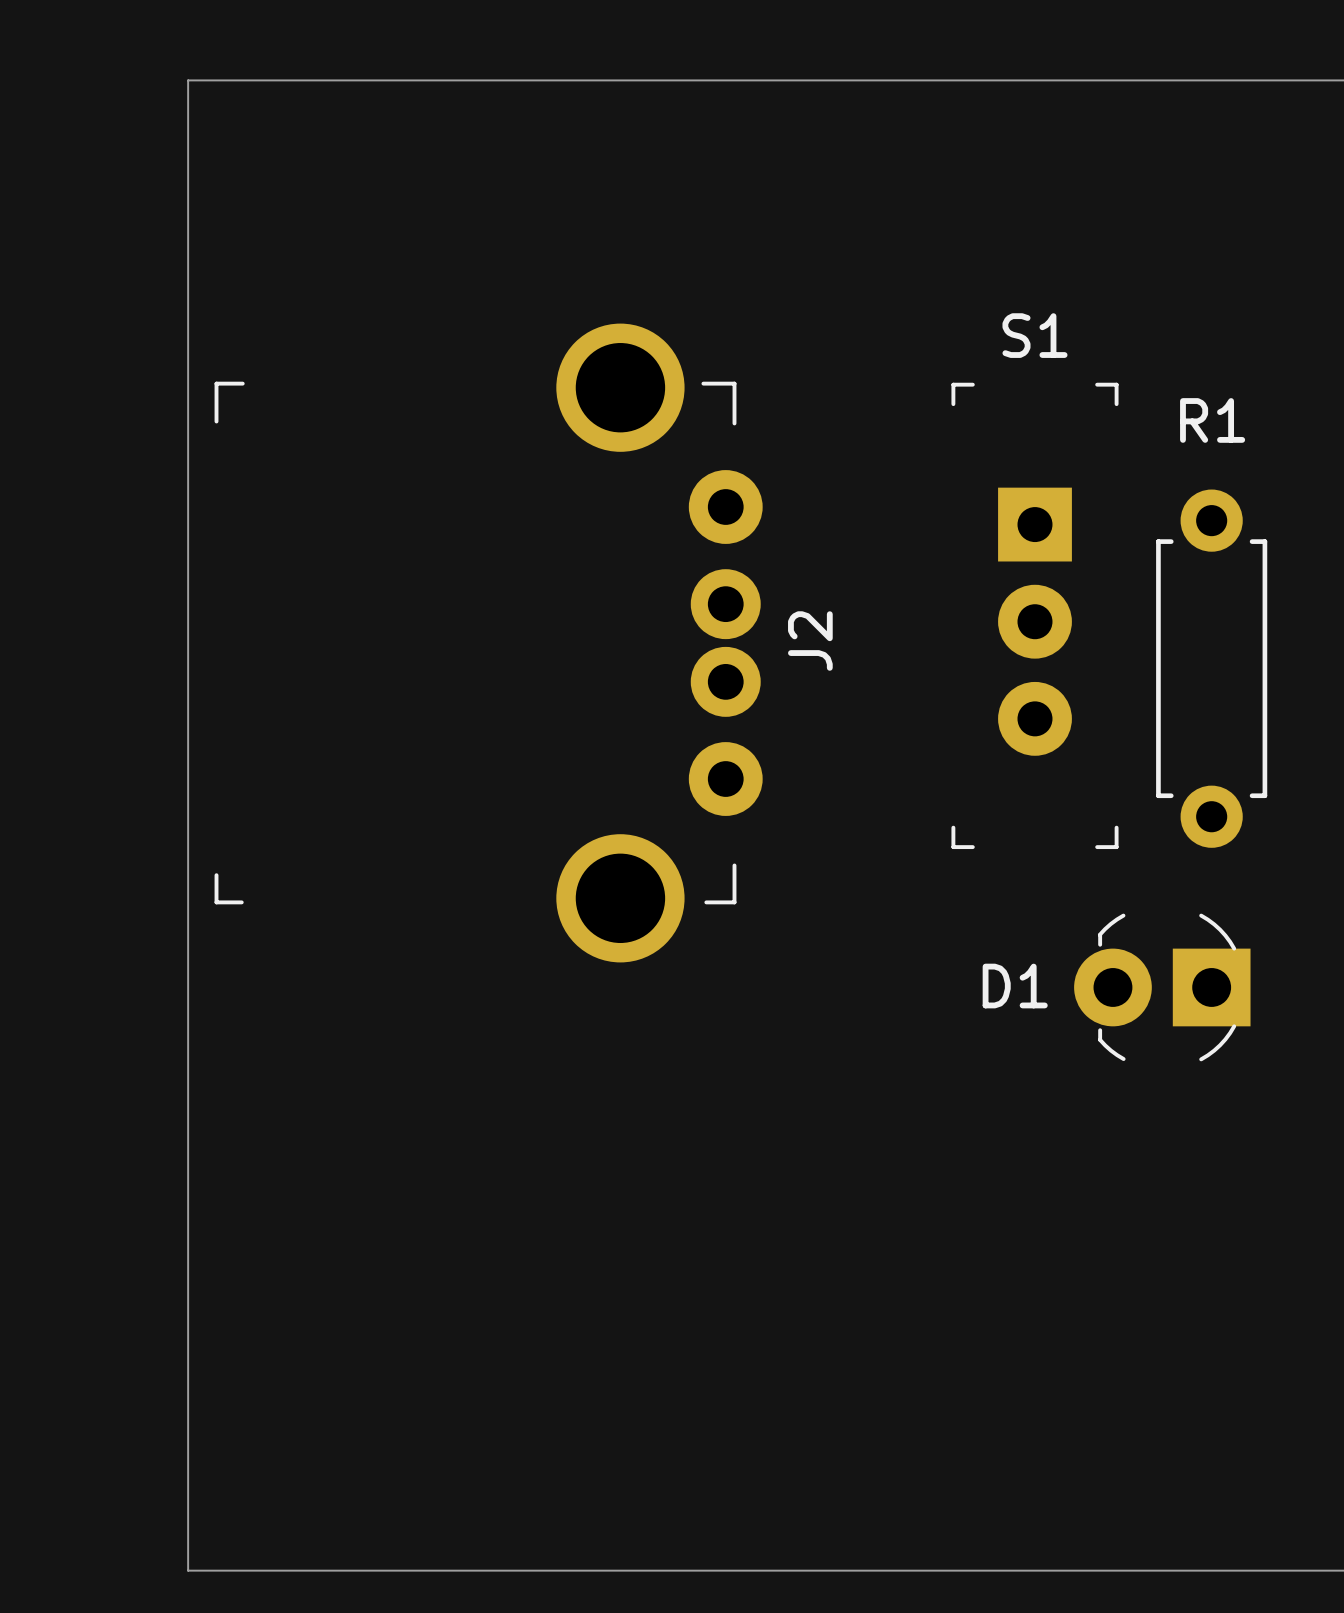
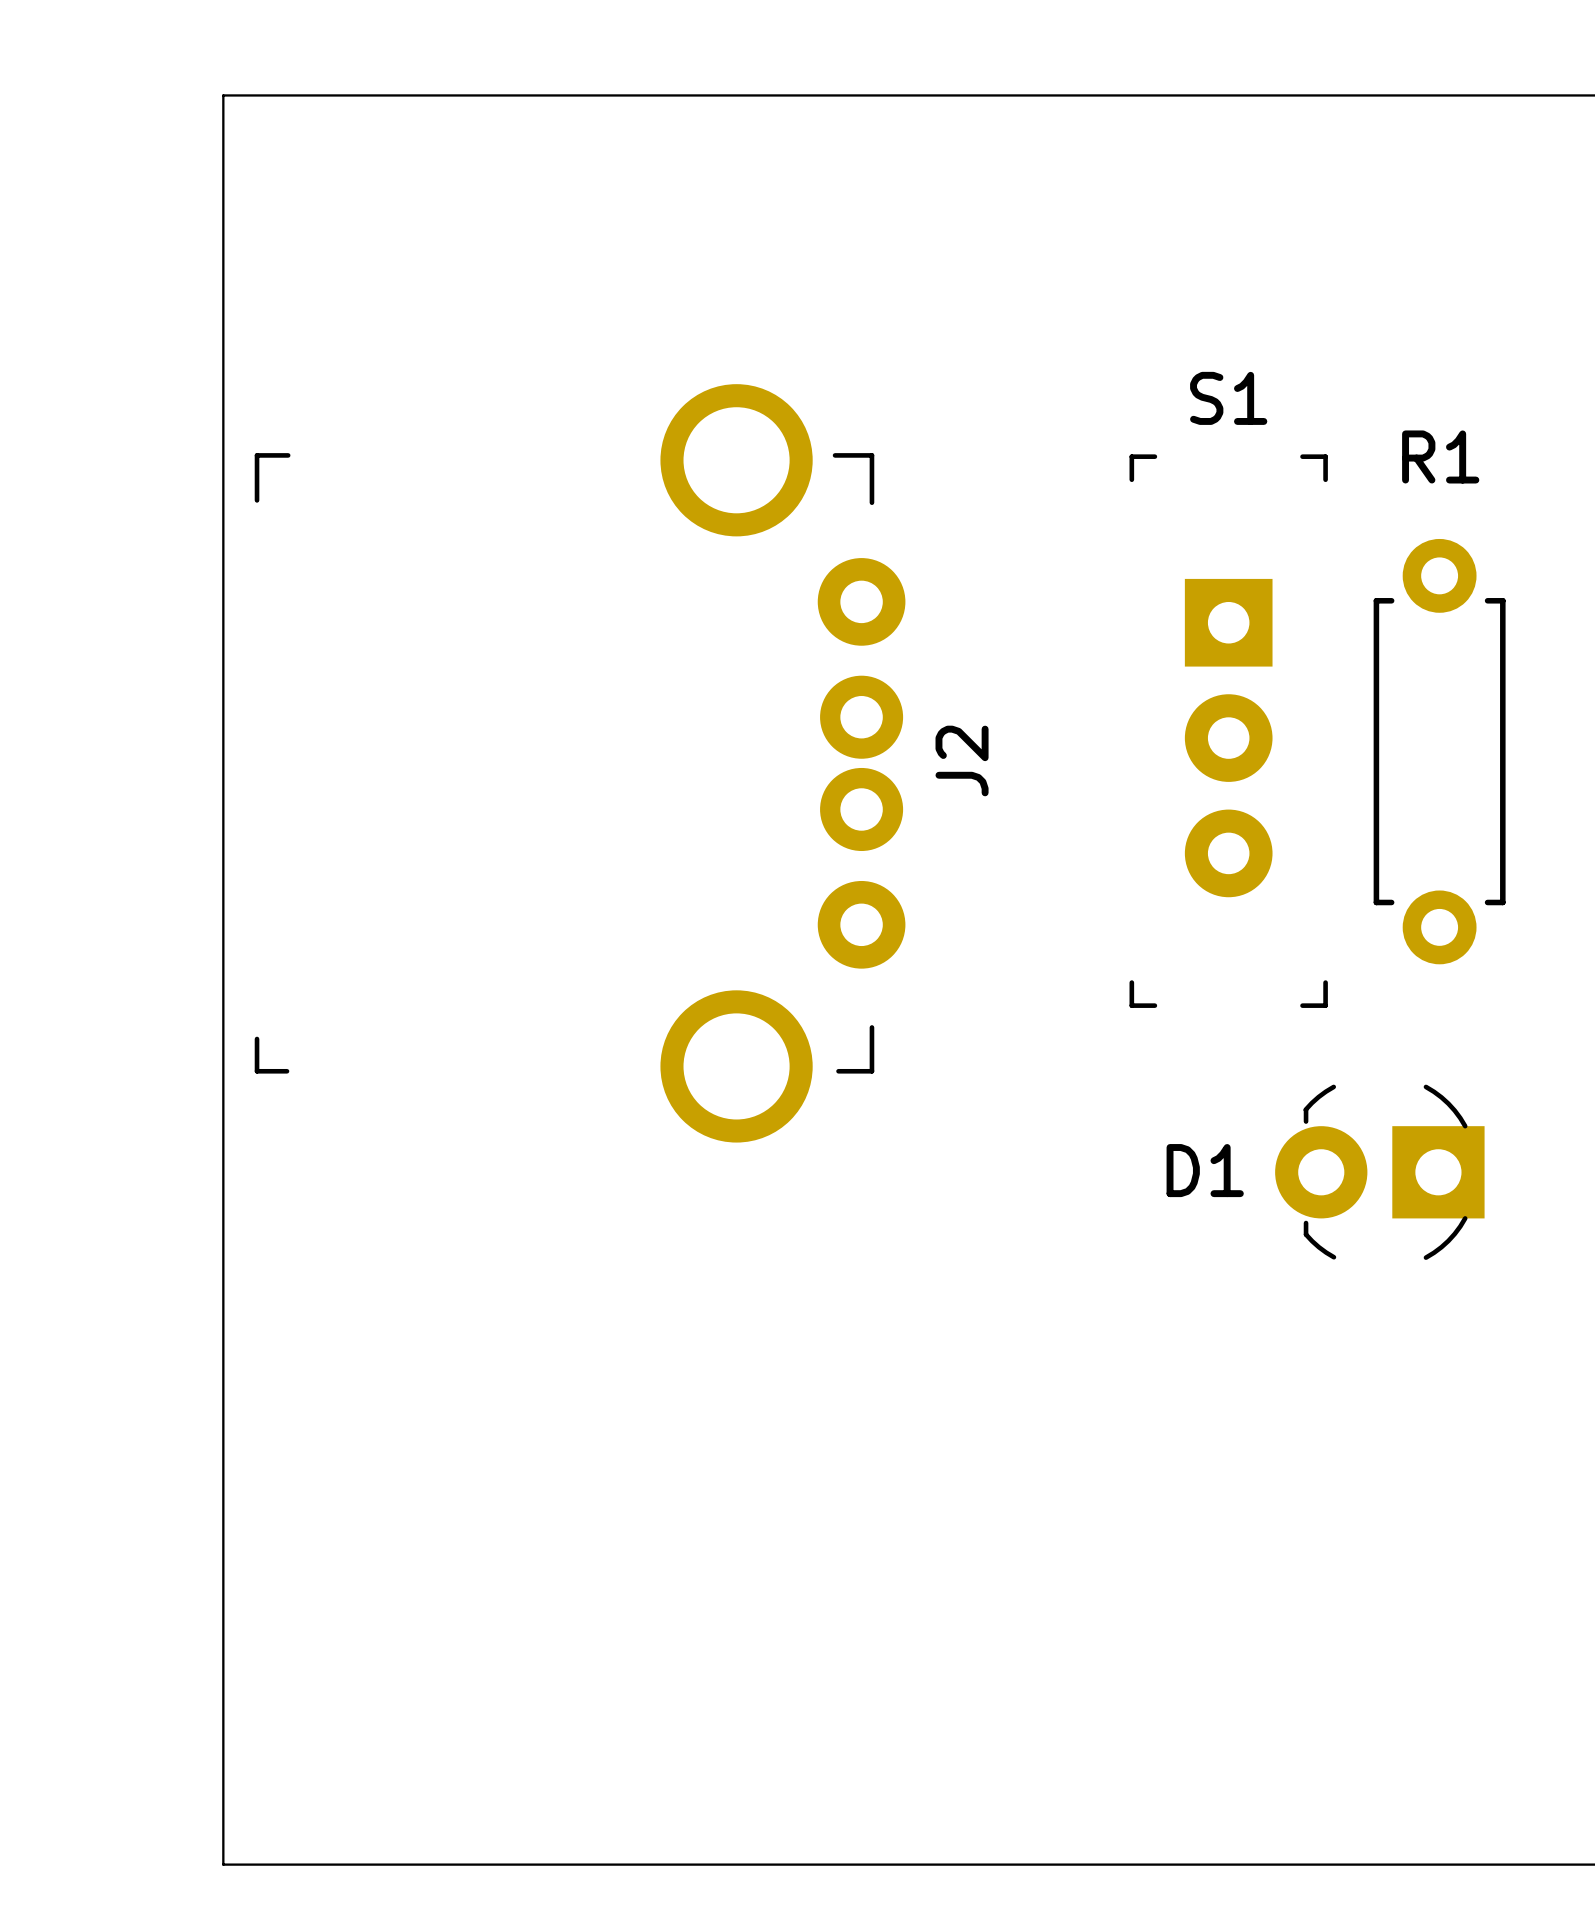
R1 position: (1211, 668) -> (1439, 751)

